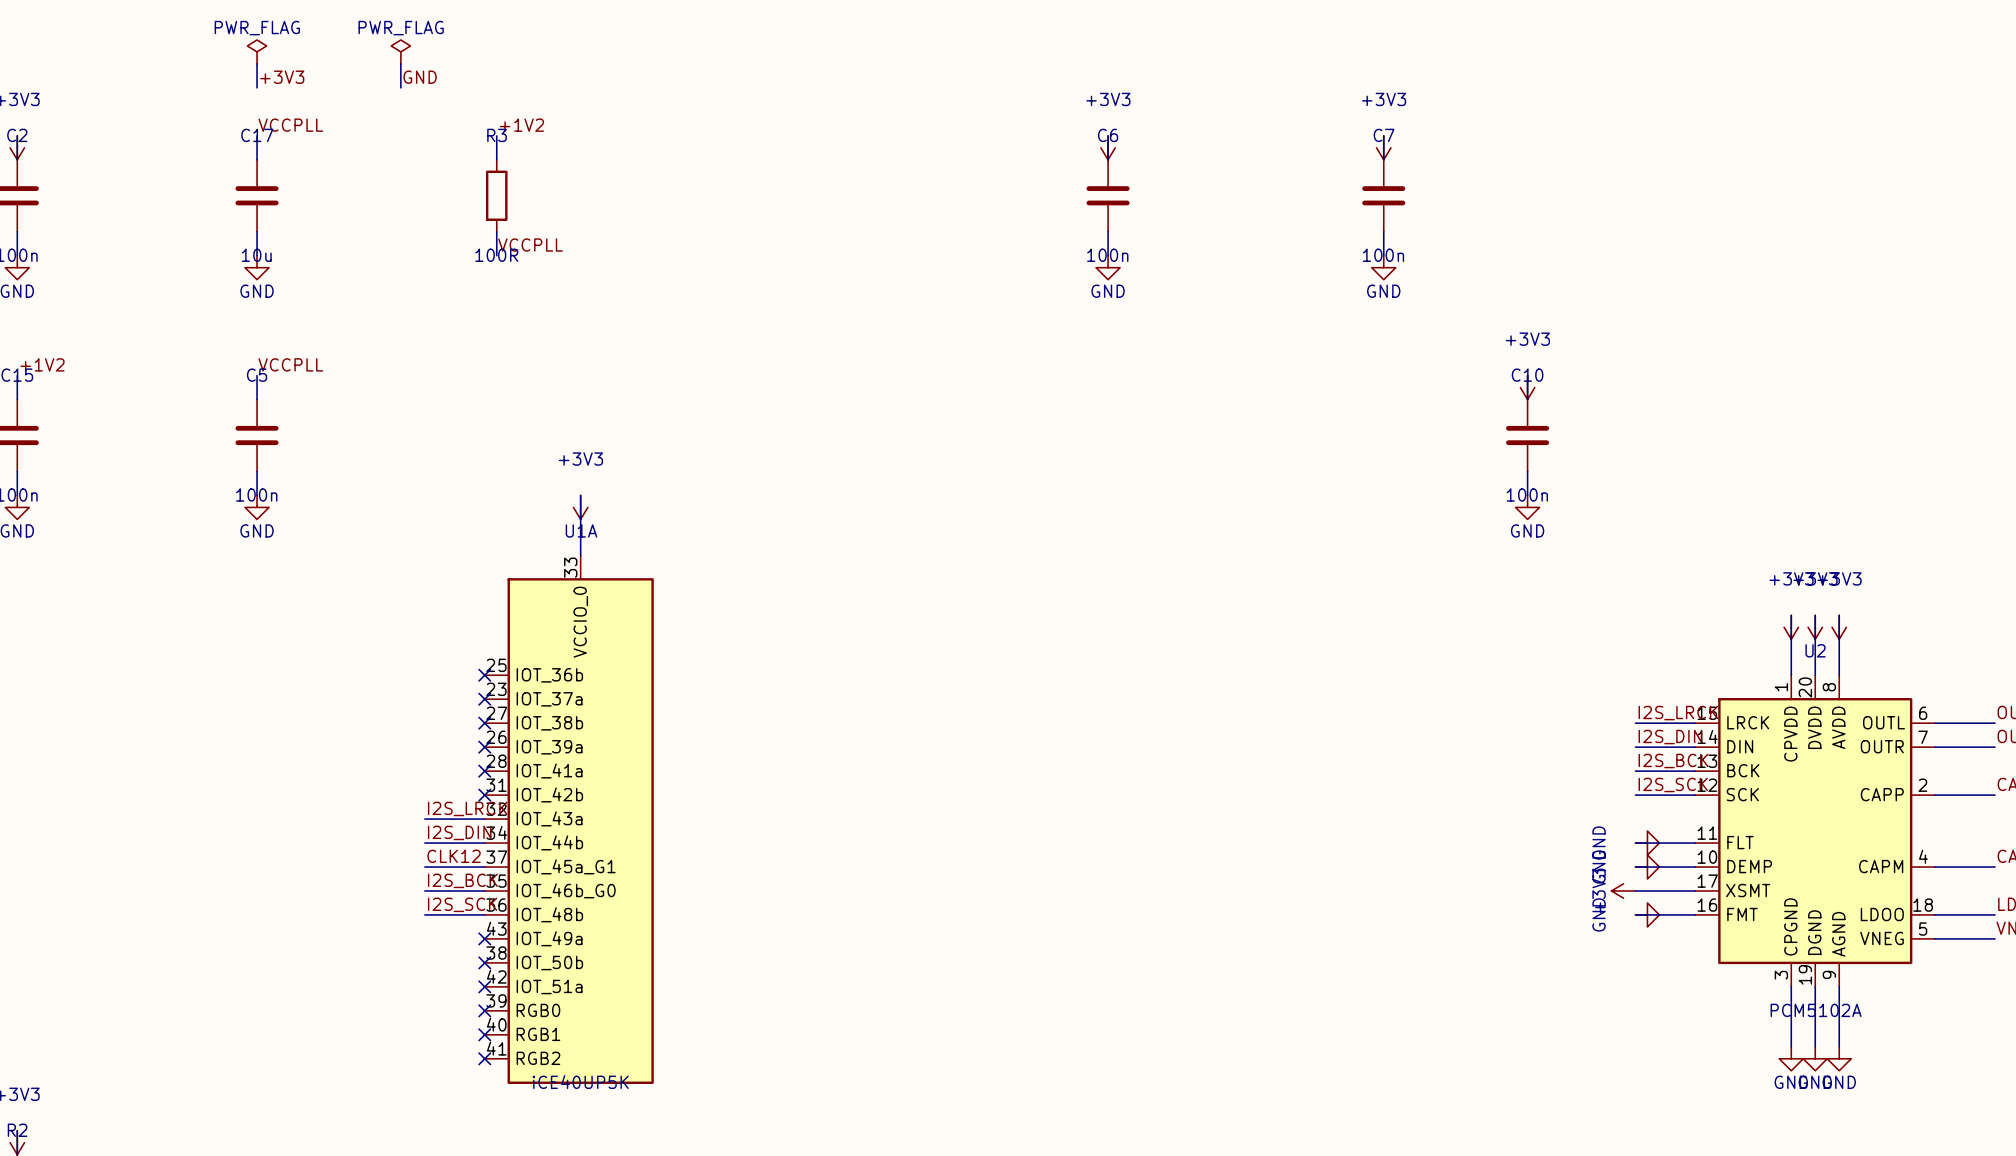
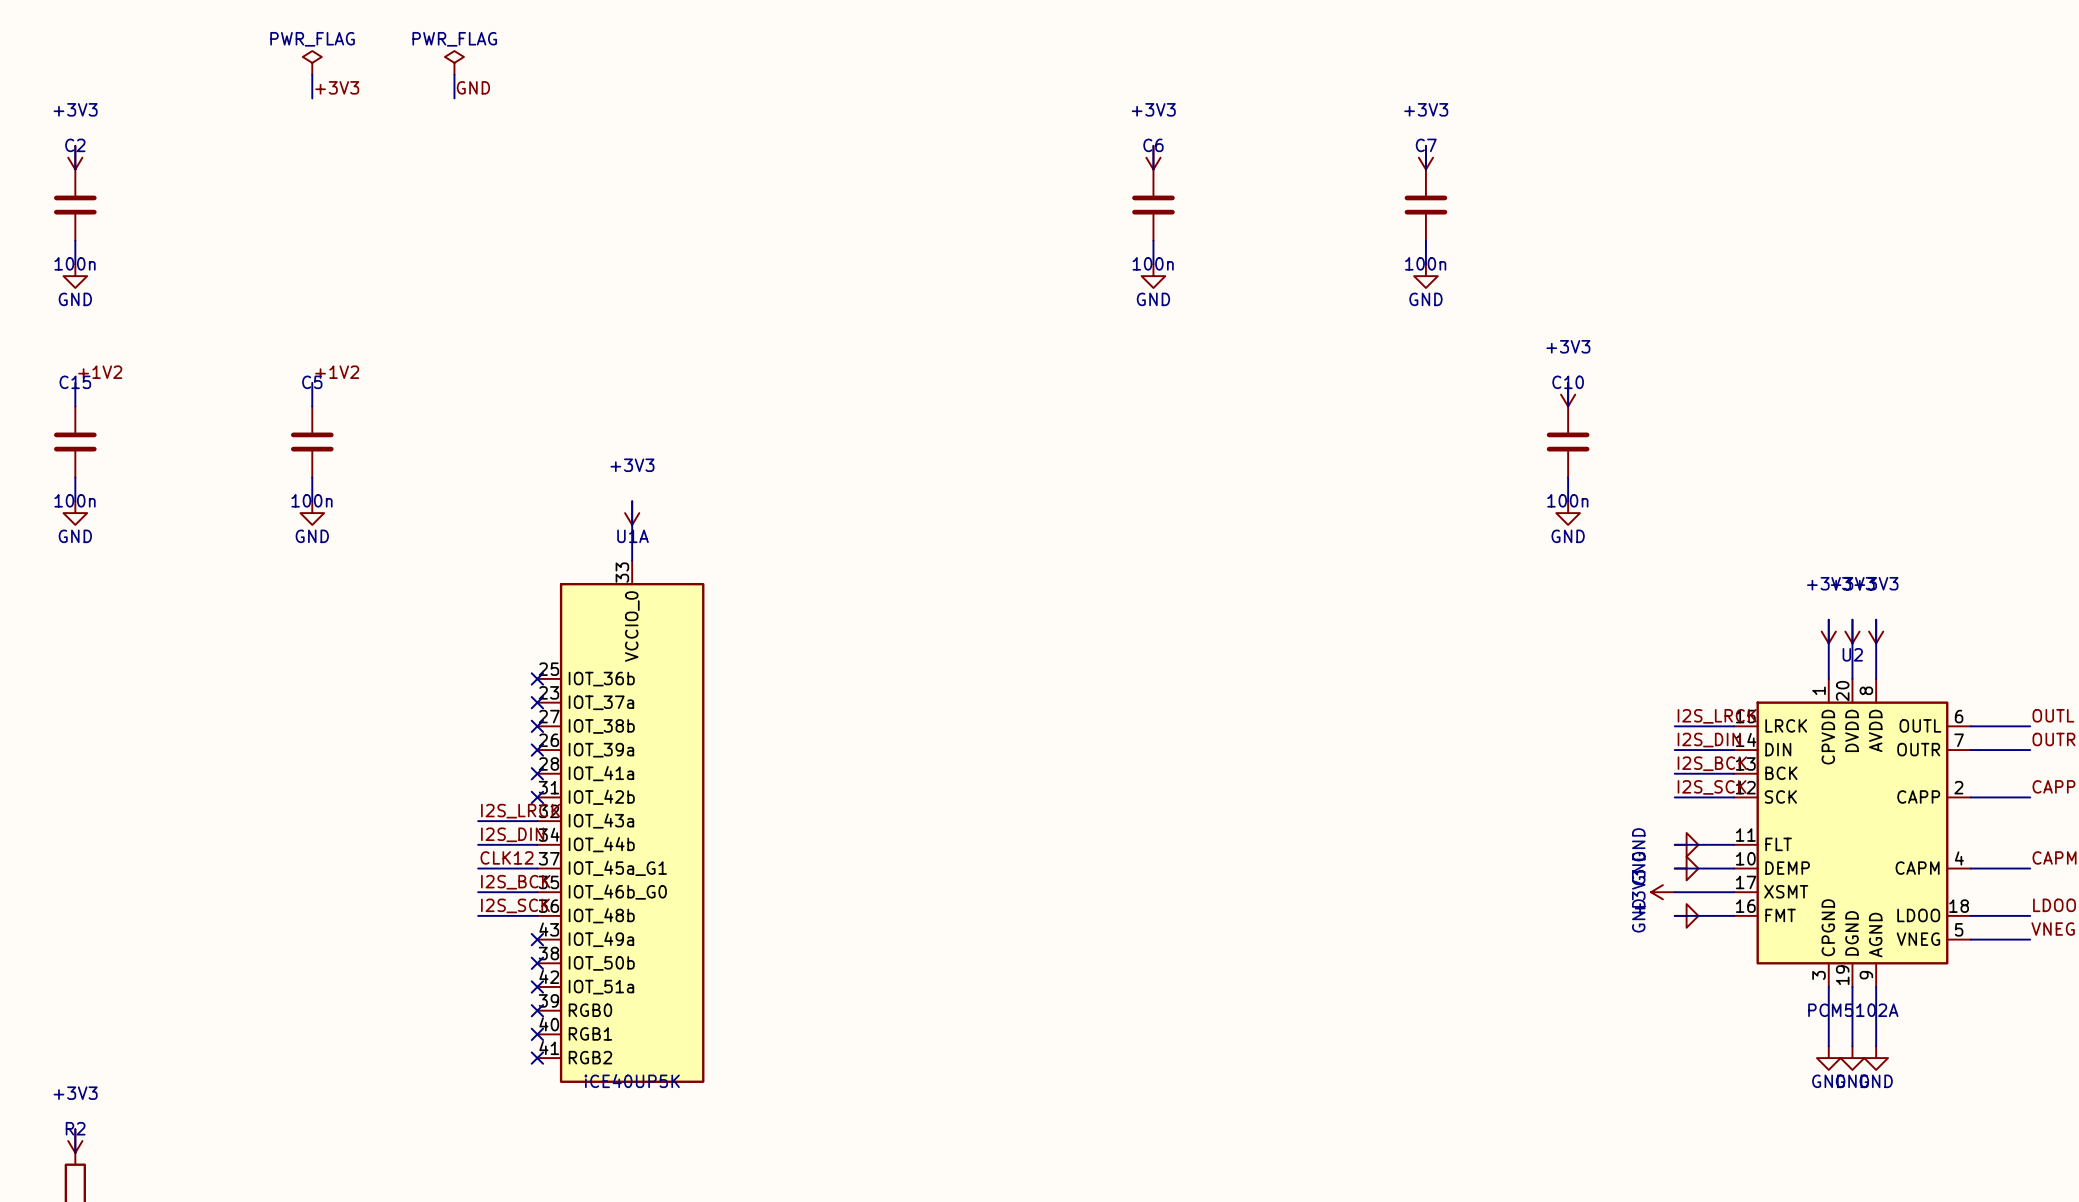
label: VCCPLL (290, 125) -> none
label: +1V2 (521, 125) -> none
wire: (257, 135) (257, 159) -> none
wire: (496, 135) (496, 159) -> none
C17: 10u (257, 195) -> none
R3: 100R (496, 195) -> none
wire: (257, 231) (257, 255) -> none
wire: (496, 231) (496, 255) -> none
label: VCCPLL (530, 245) -> none
power symbol: GND (257, 267) -> none
label: VCCPLL (290, 364) -> +1V2 (337, 372)

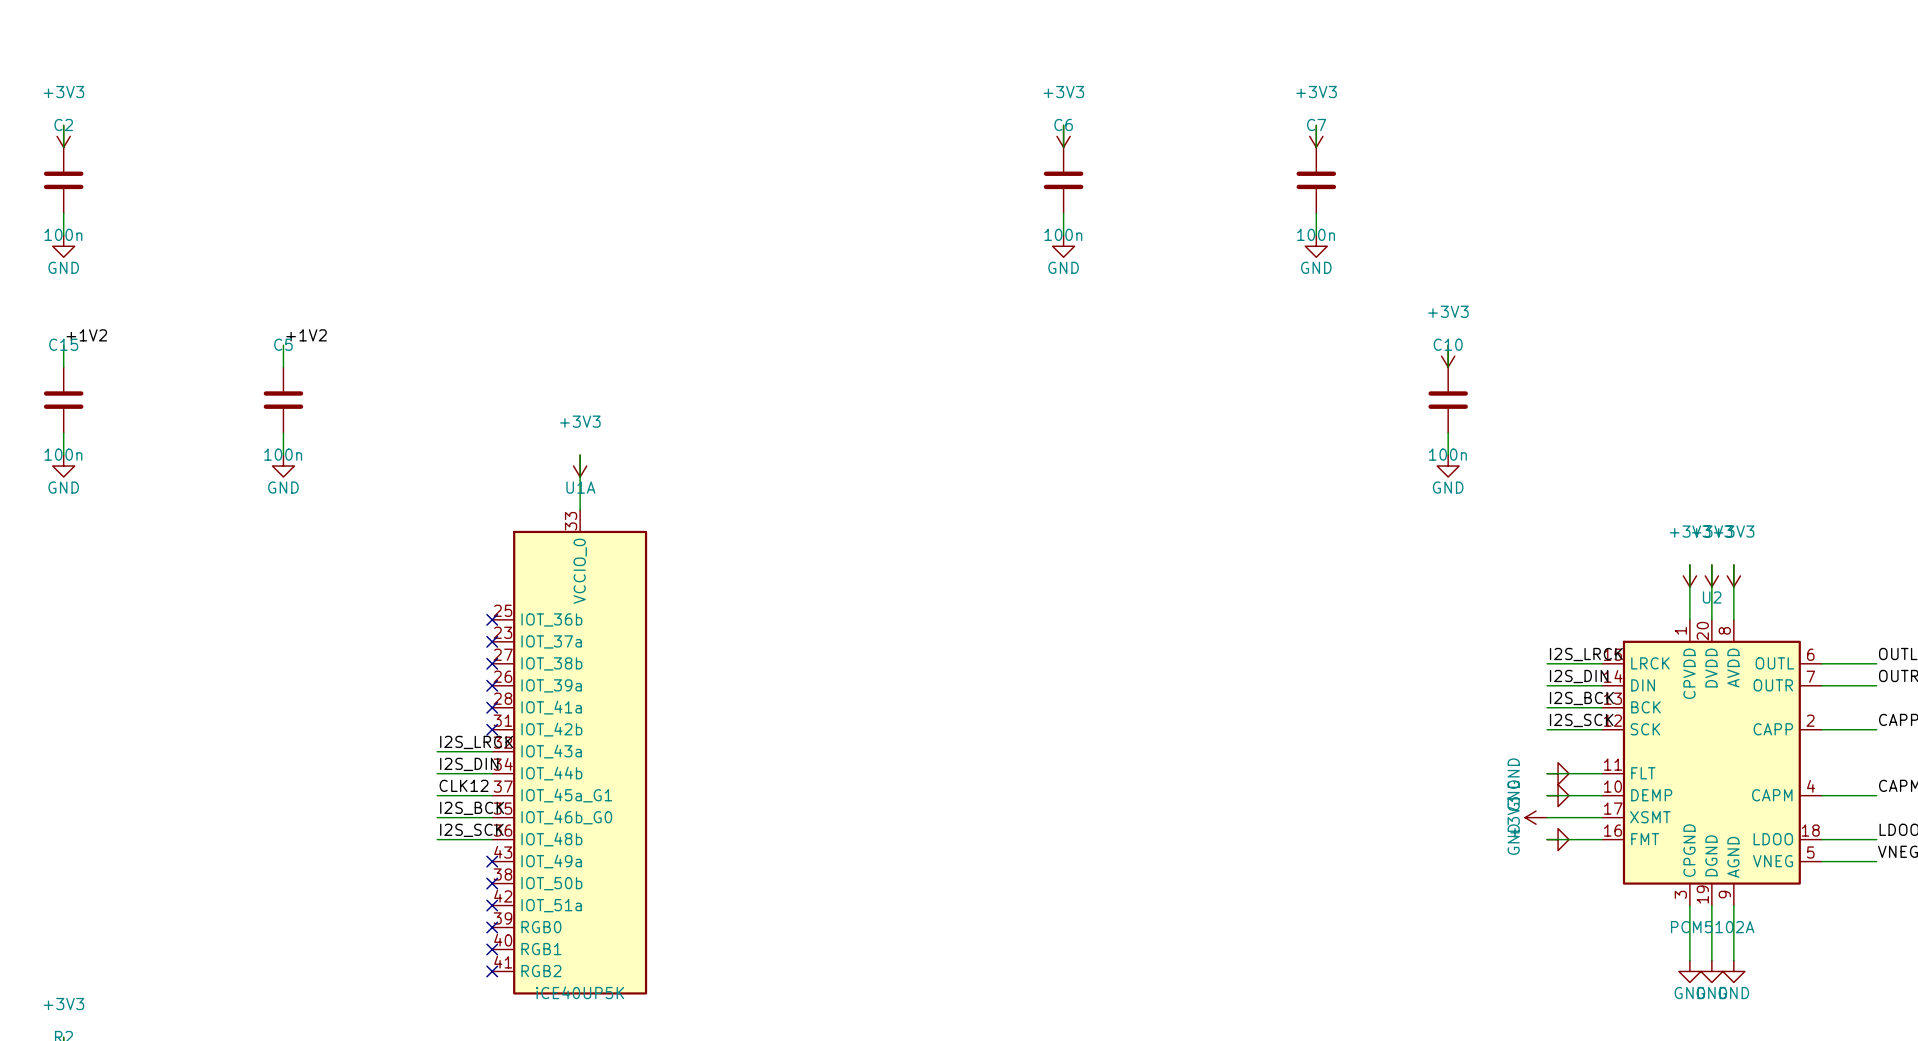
power symbol: PWR_FLAG (312, 62) -> none
power symbol: PWR_FLAG (454, 62) -> none
wire: (312, 74) (312, 98) -> none
wire: (454, 74) (454, 98) -> none
label: +3V3 (337, 87) -> none
label: GND (473, 87) -> none

